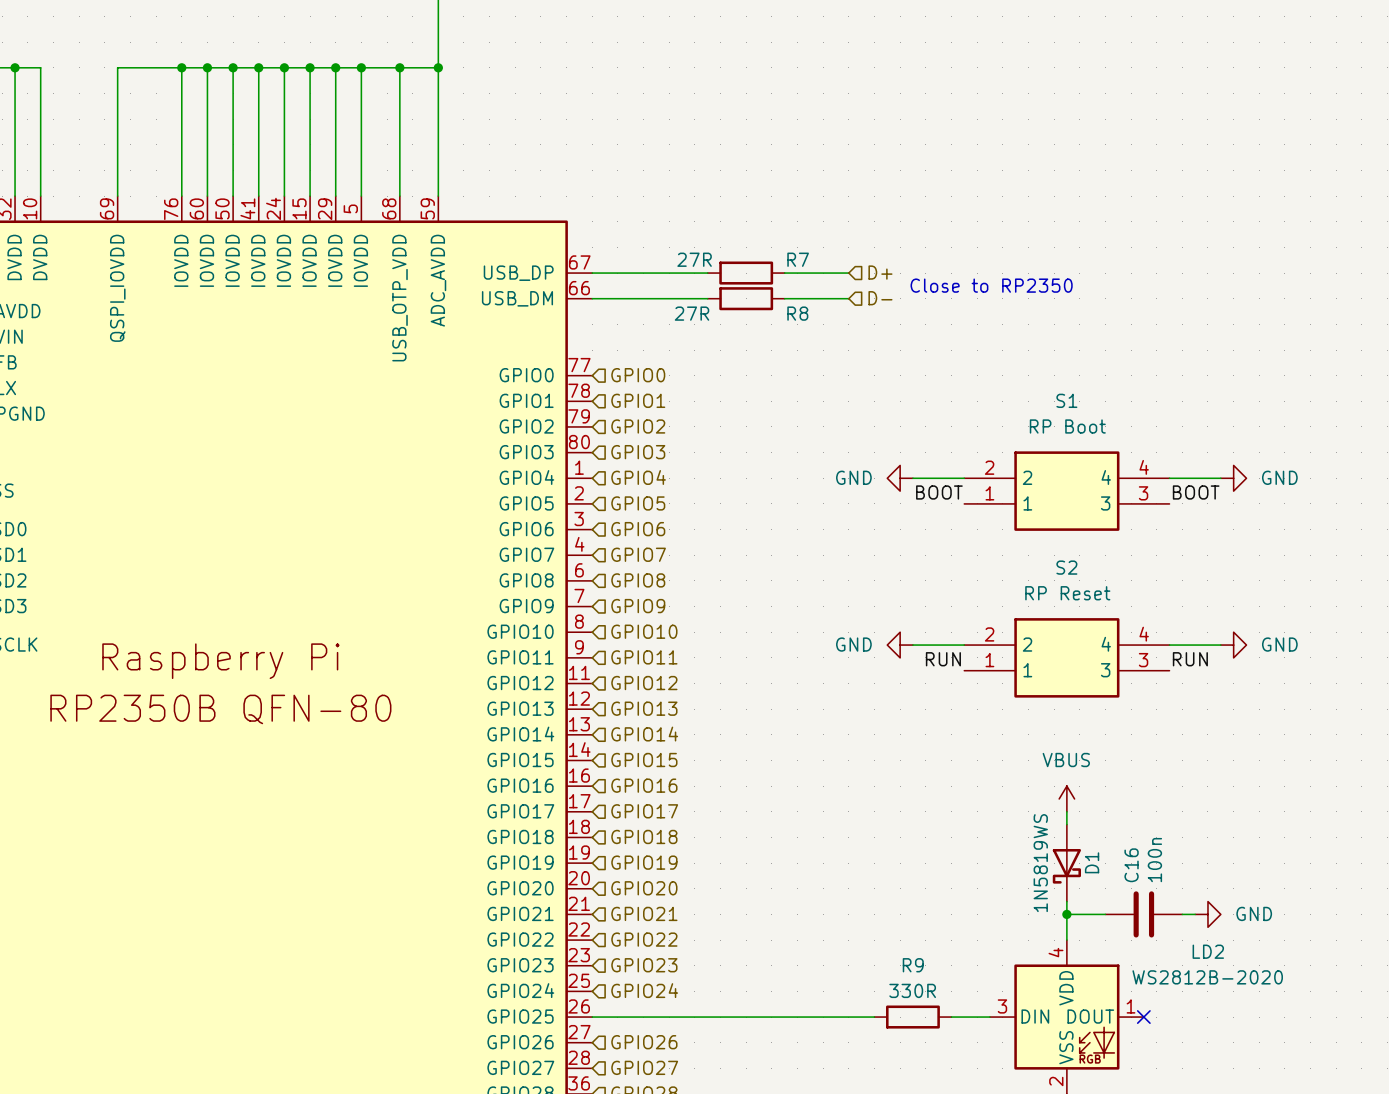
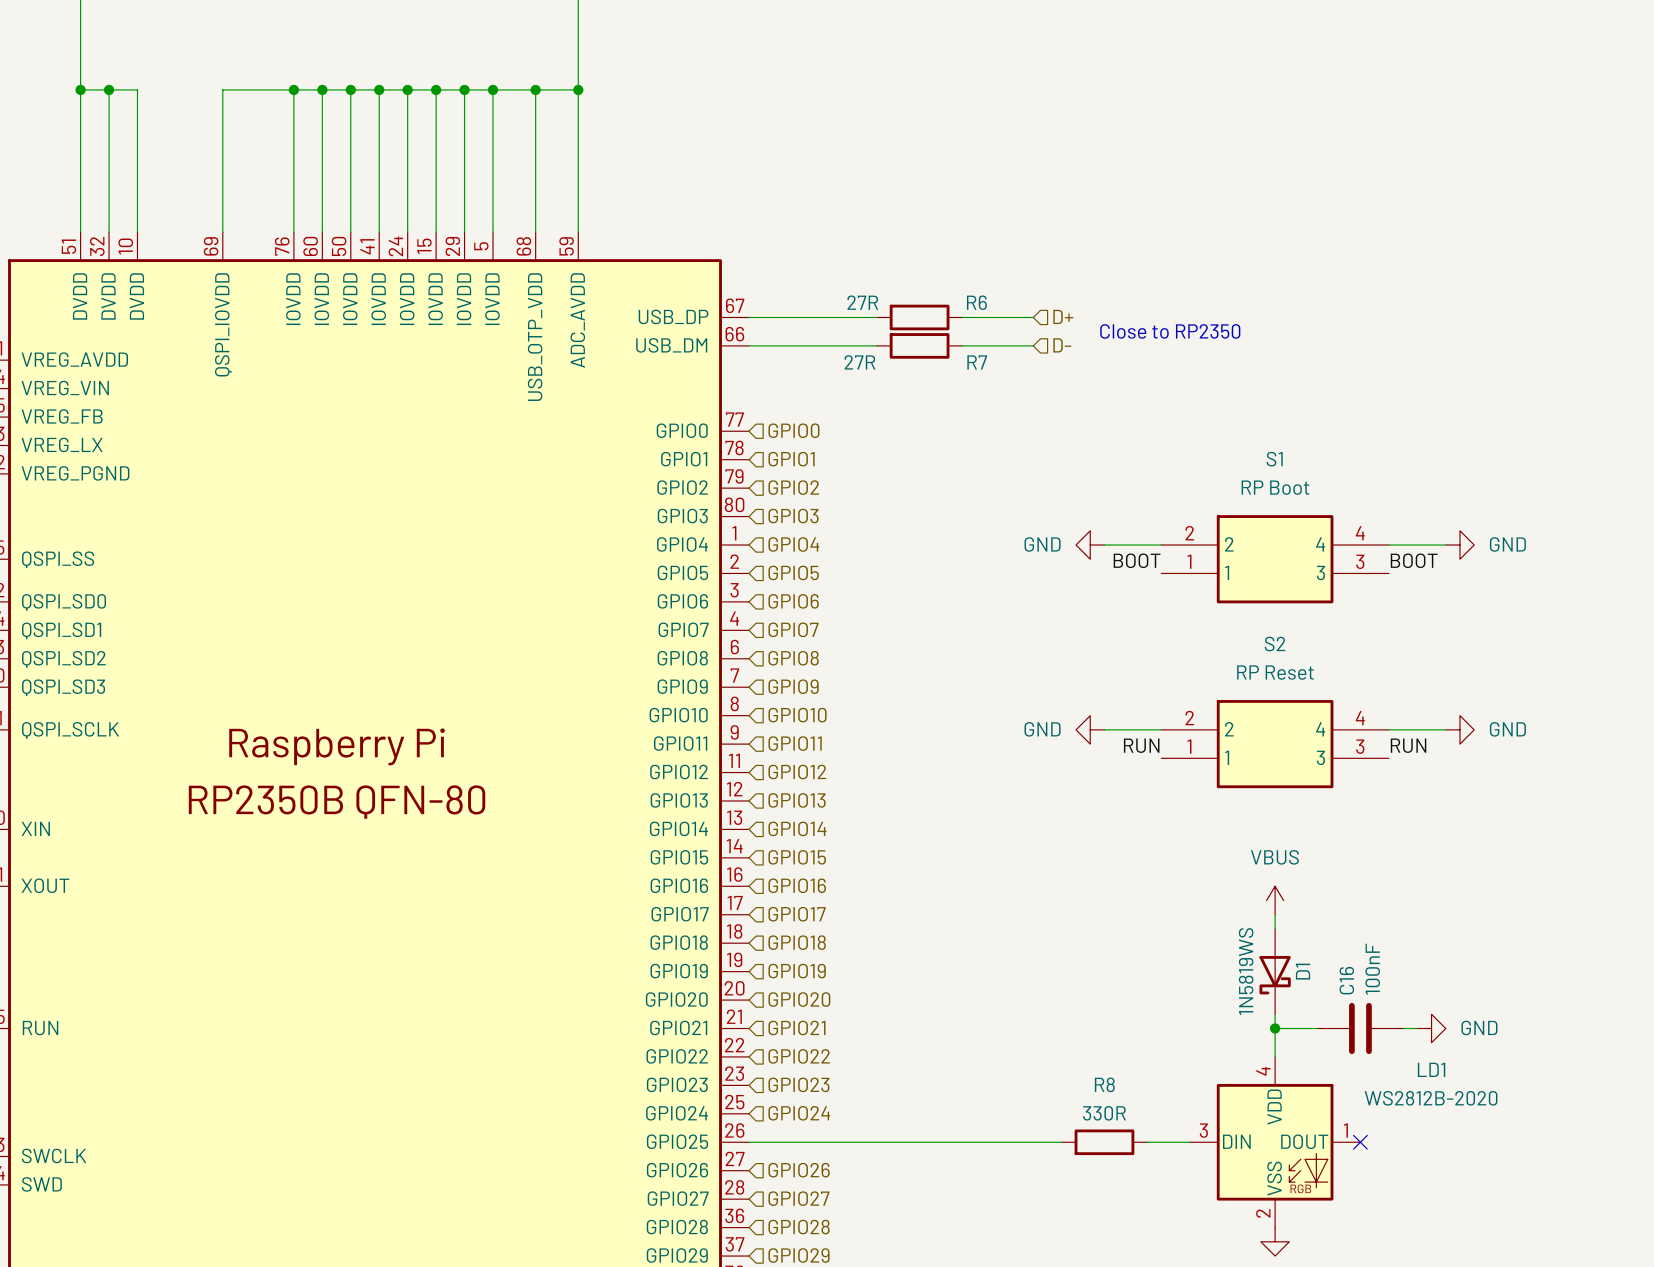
R7 name: R7 (798, 259) -> R6 (976, 302)
R8 name: R8 (797, 313) -> R7 (977, 362)
C16 value: 100n (1154, 860) -> 100nF (1372, 969)
LD2 name: LD2 (1208, 951) -> LD1 (1431, 1069)
R9 name: R9 (913, 965) -> R8 (1104, 1084)

